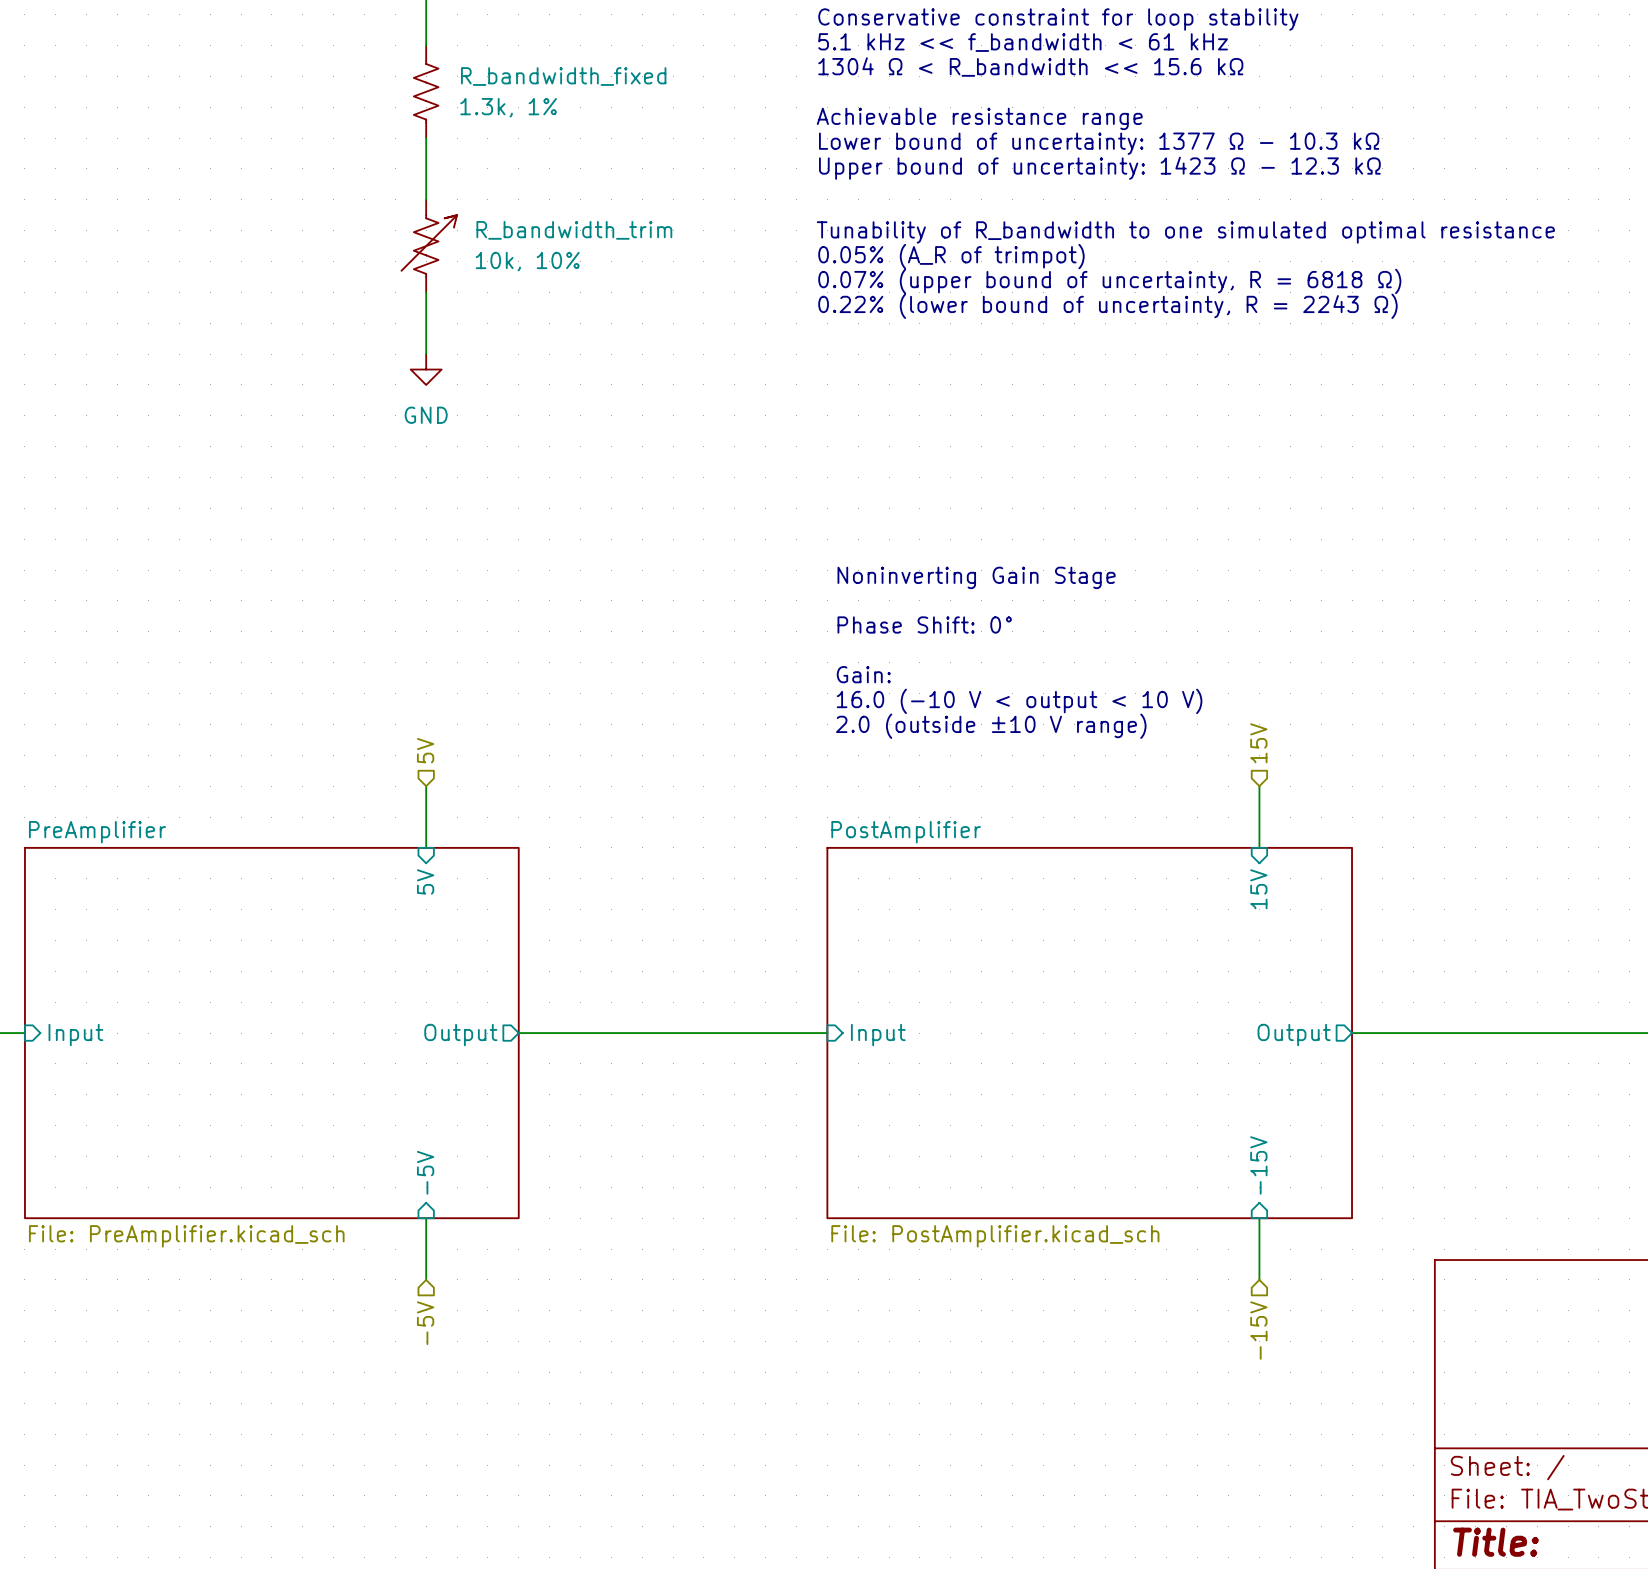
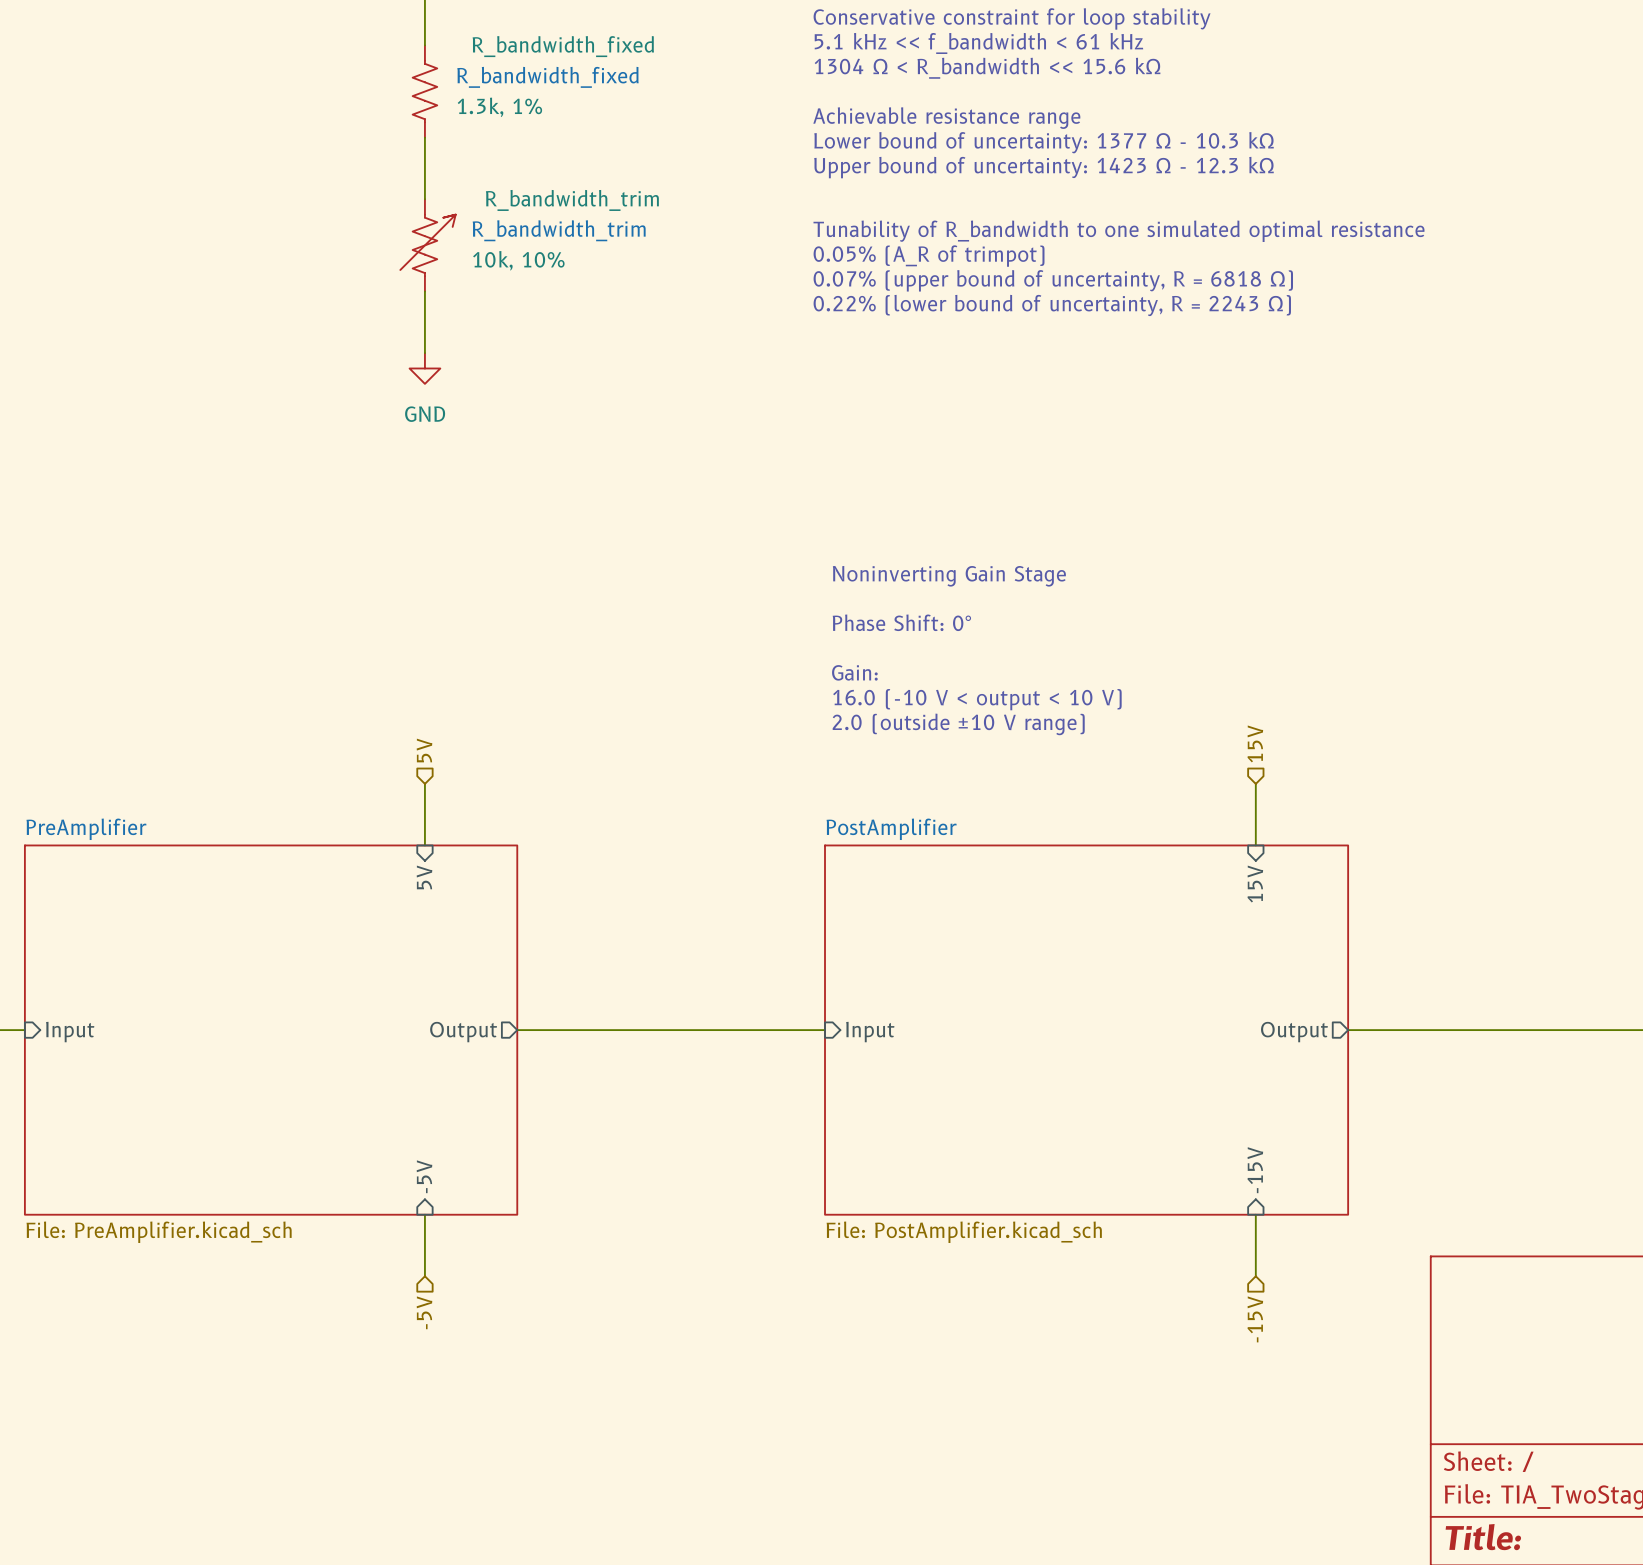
R_bandwidth_fixed text: none -> R_bandwidth_fixed (563, 46)
R_bandwidth_trim text: none -> R_bandwidth_trim (572, 200)

